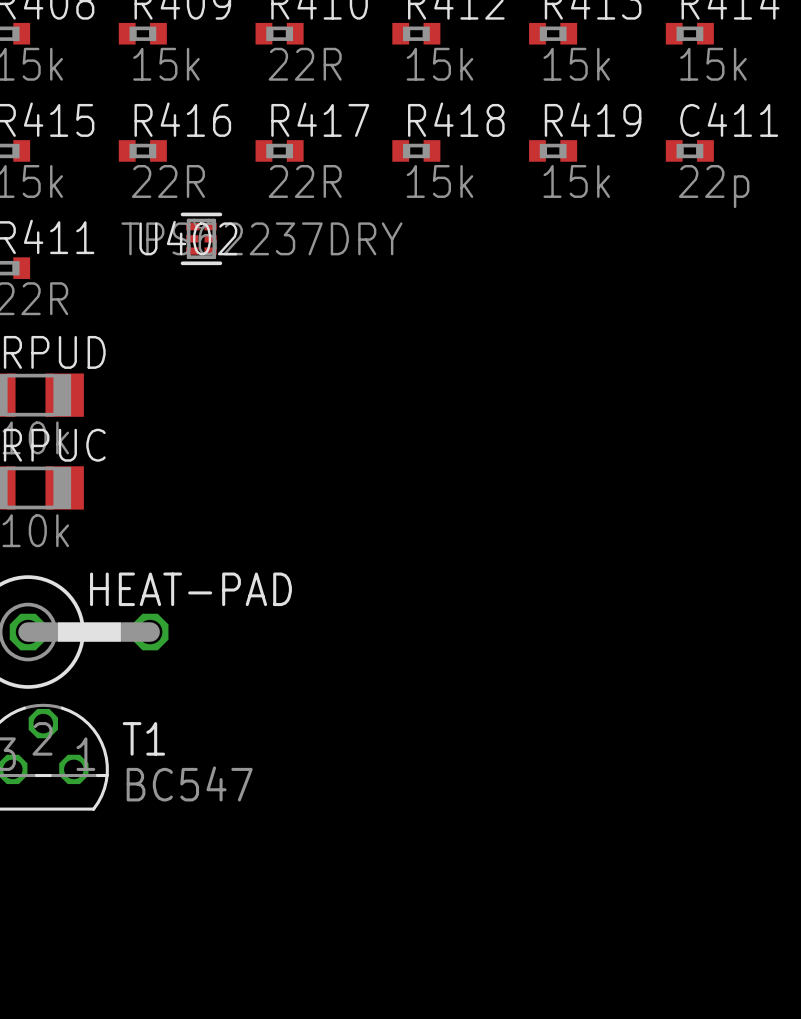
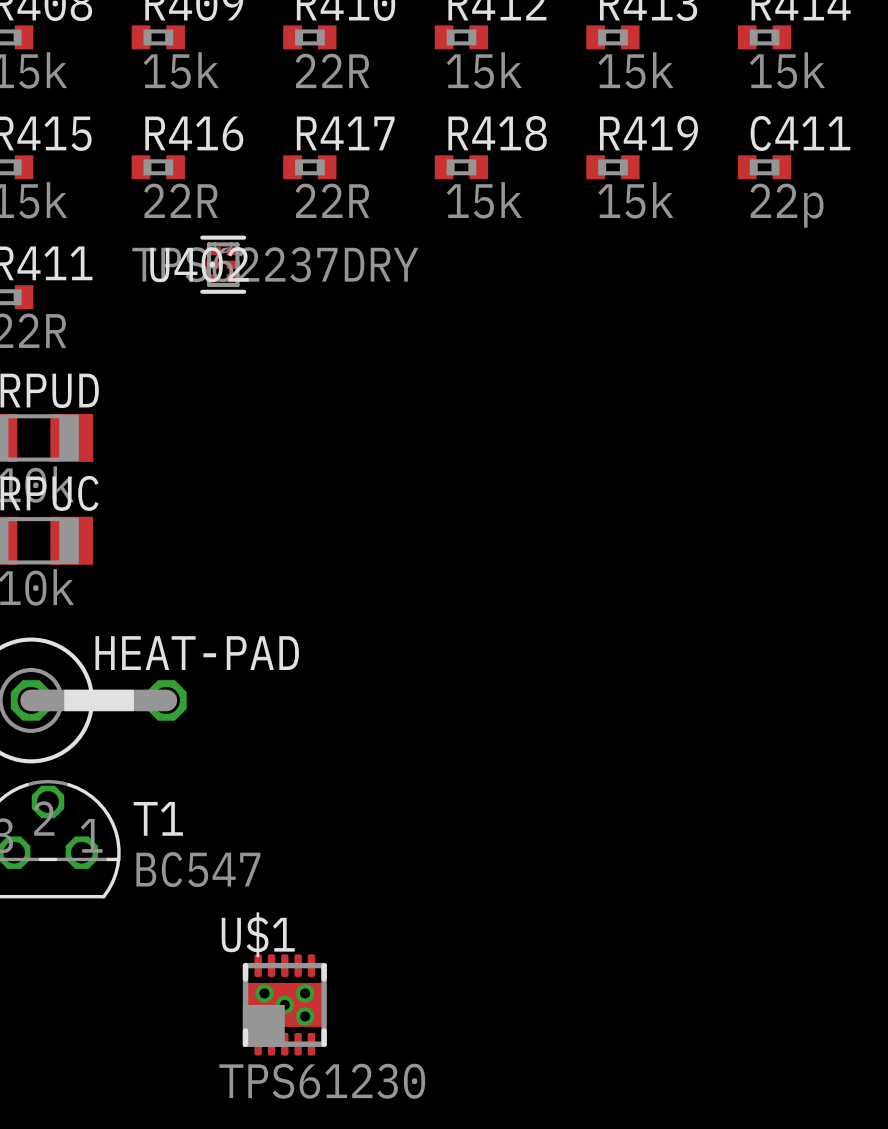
U$1: none -> TPS61230 (284, 1004)

